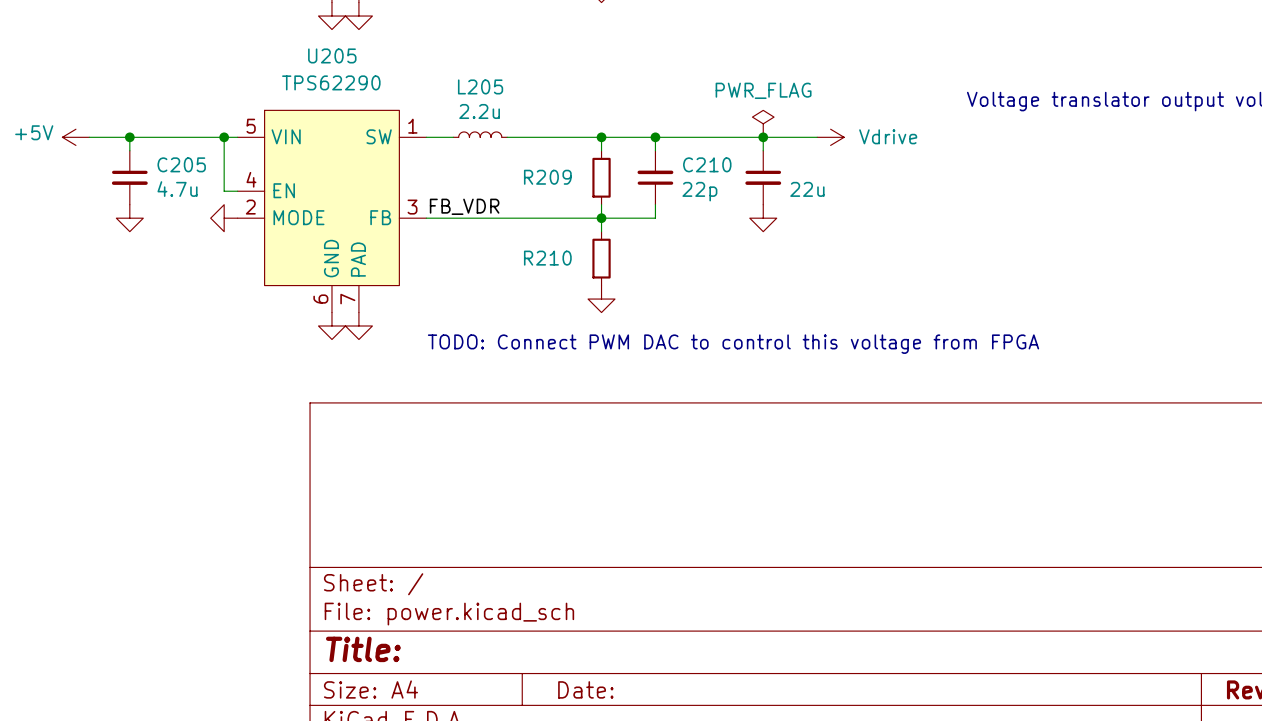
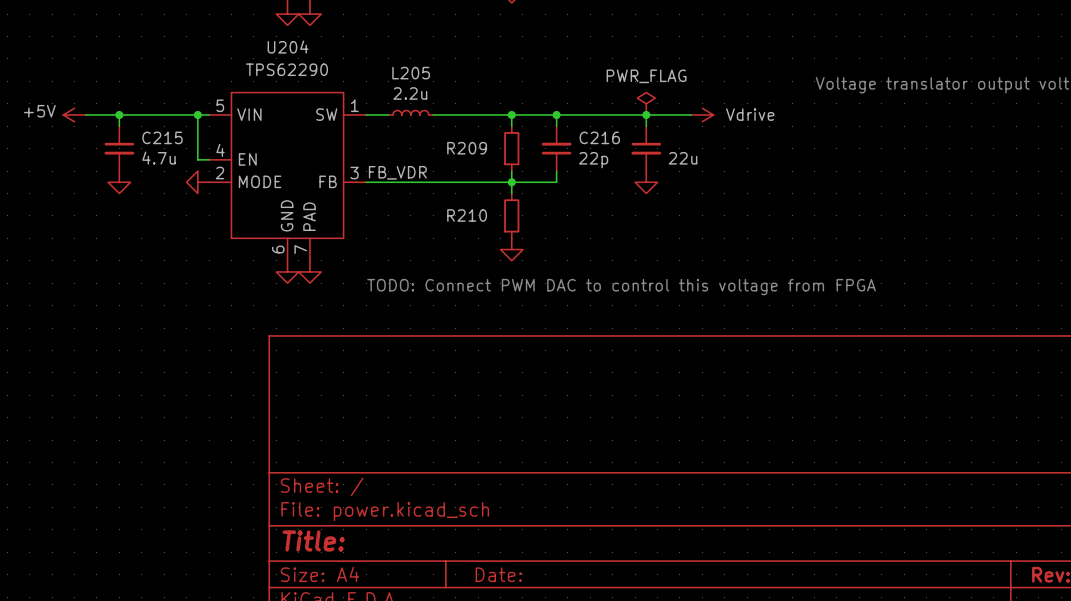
U205 name: U205 (332, 55) -> U204 (288, 47)
C205 name: C205 (181, 164) -> C215 (162, 137)
C210 name: C210 (707, 164) -> C216 (599, 137)

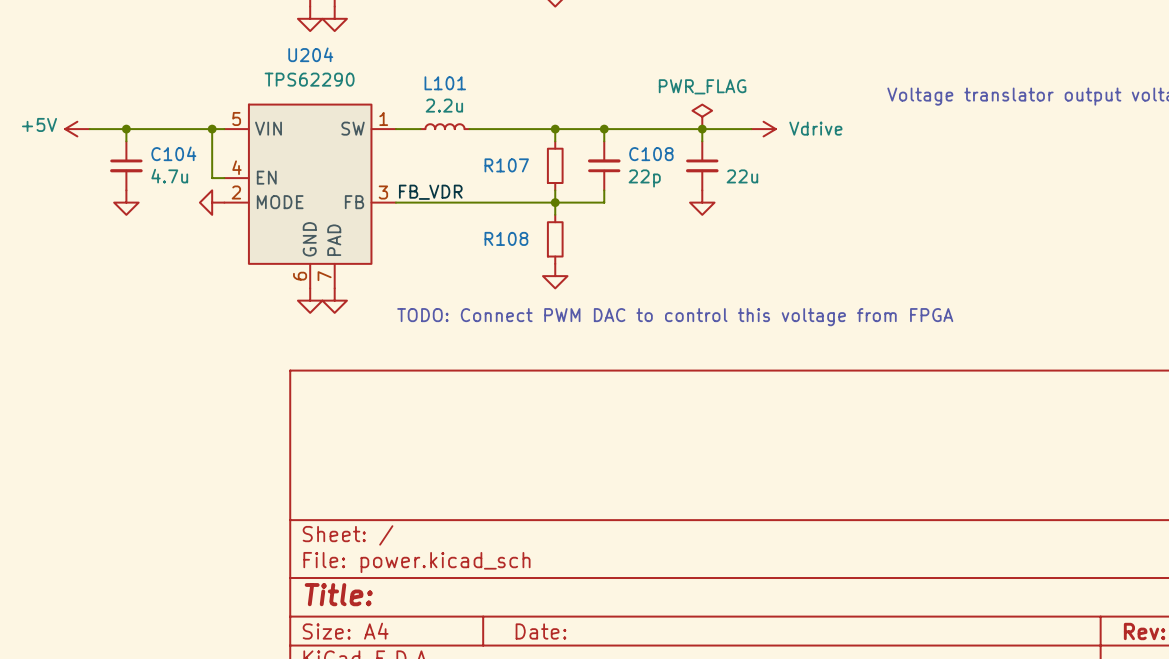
L205 name: L205 (411, 73) -> L101 (445, 83)
C215 name: C215 (162, 137) -> C104 (173, 153)
C216 name: C216 (599, 137) -> C108 (651, 154)
R209 name: R209 (467, 148) -> R107 (506, 165)
R210 name: R210 (467, 215) -> R108 (506, 238)

